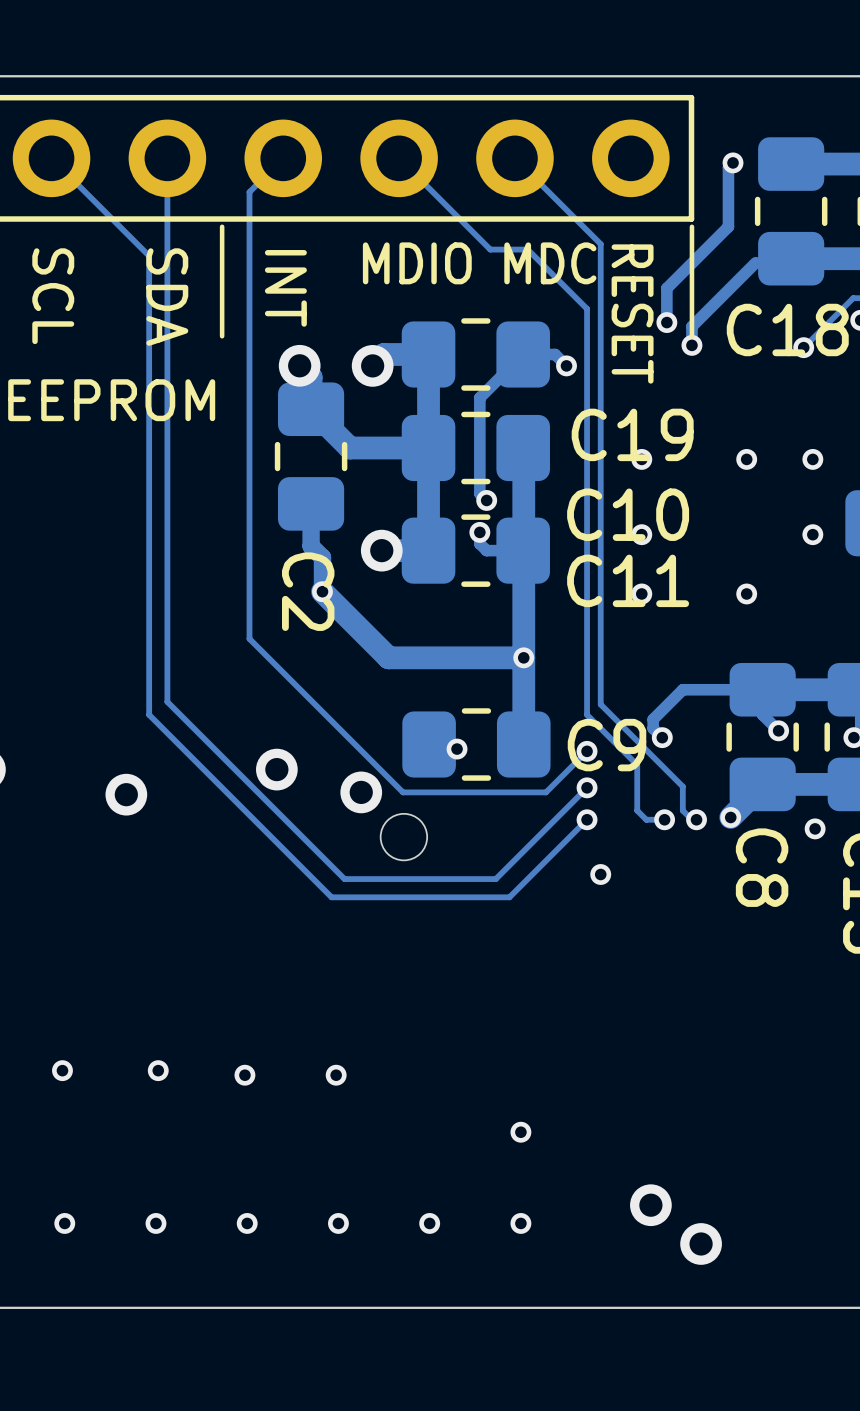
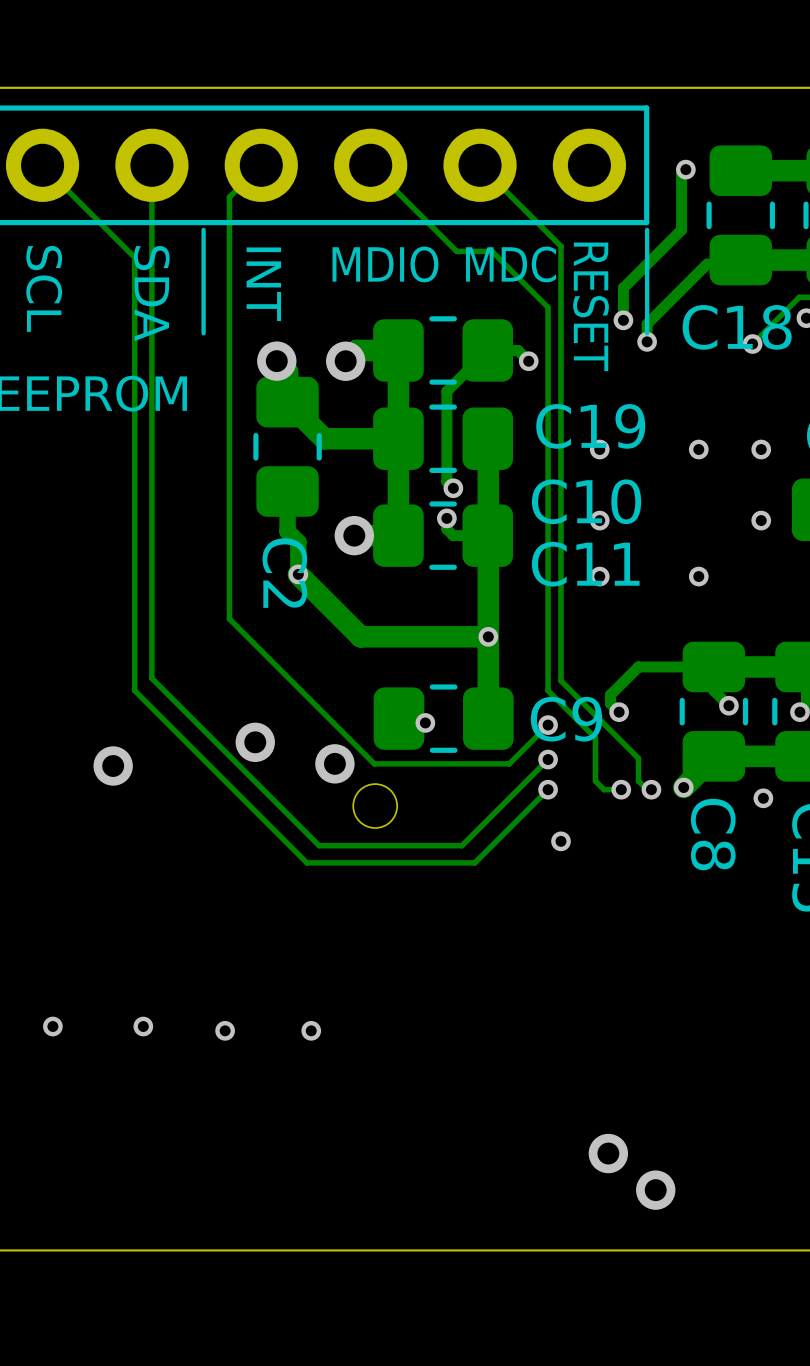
via: (520, 1132) -> none
via: (64, 1223) -> none
via: (155, 1223) -> none
via: (247, 1223) -> none
via: (338, 1223) -> none
via: (429, 1223) -> none
via: (520, 1223) -> none

